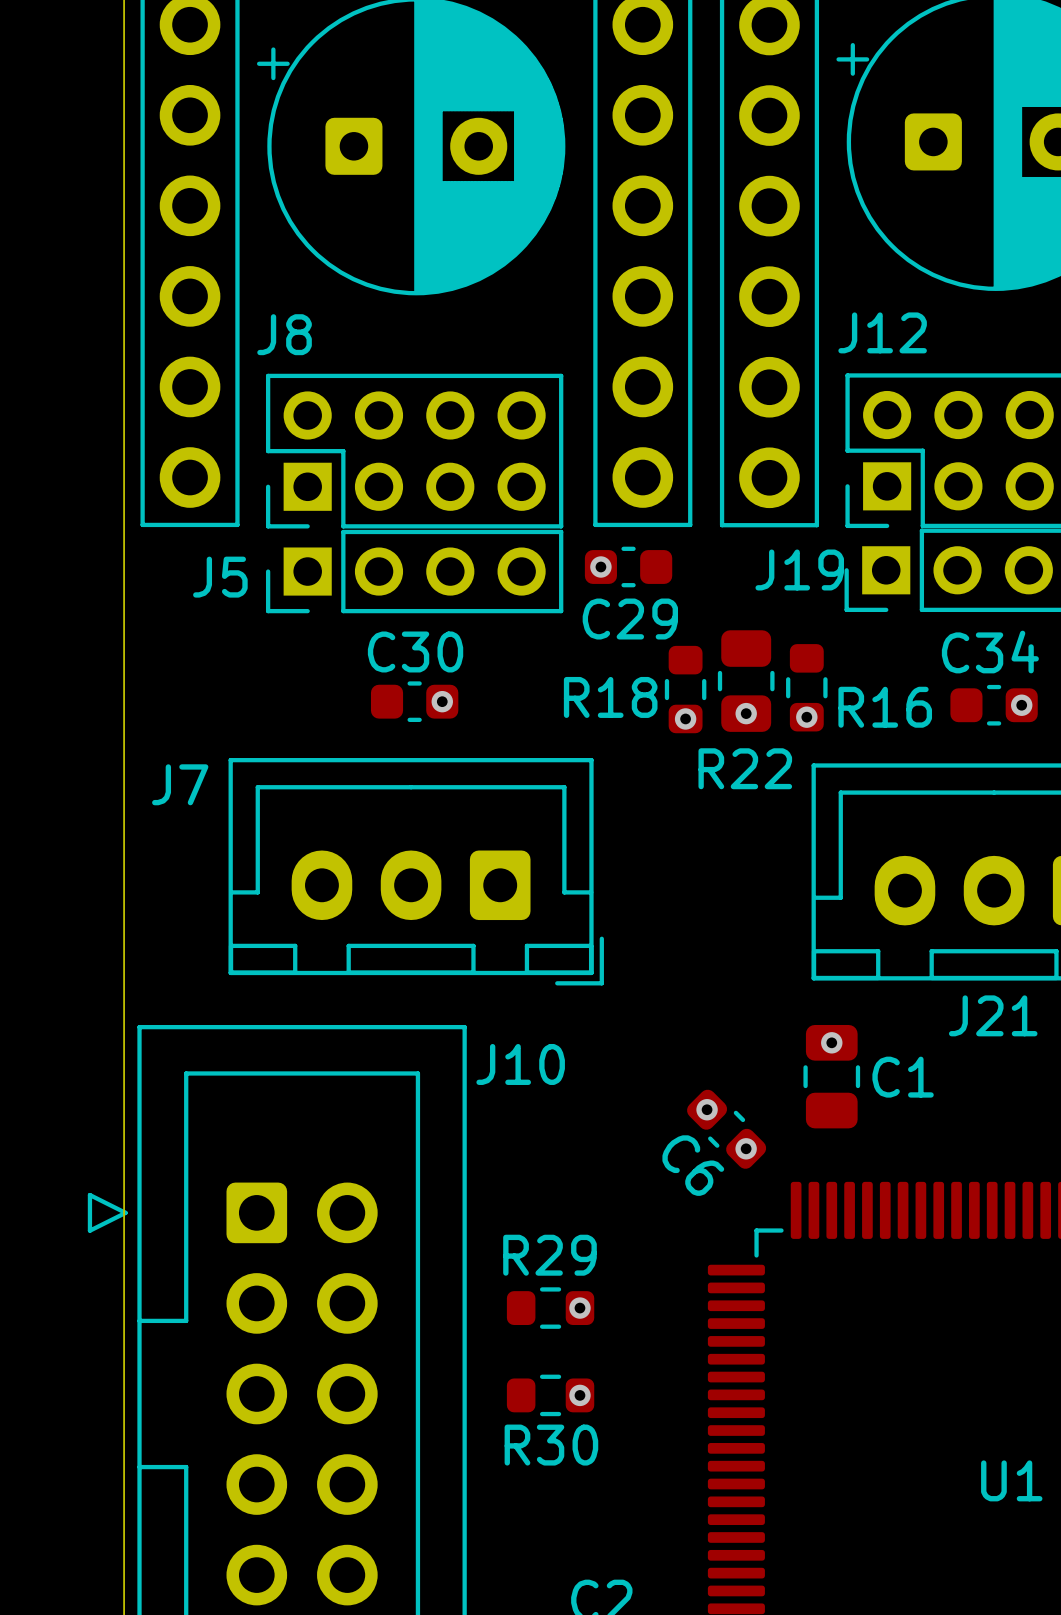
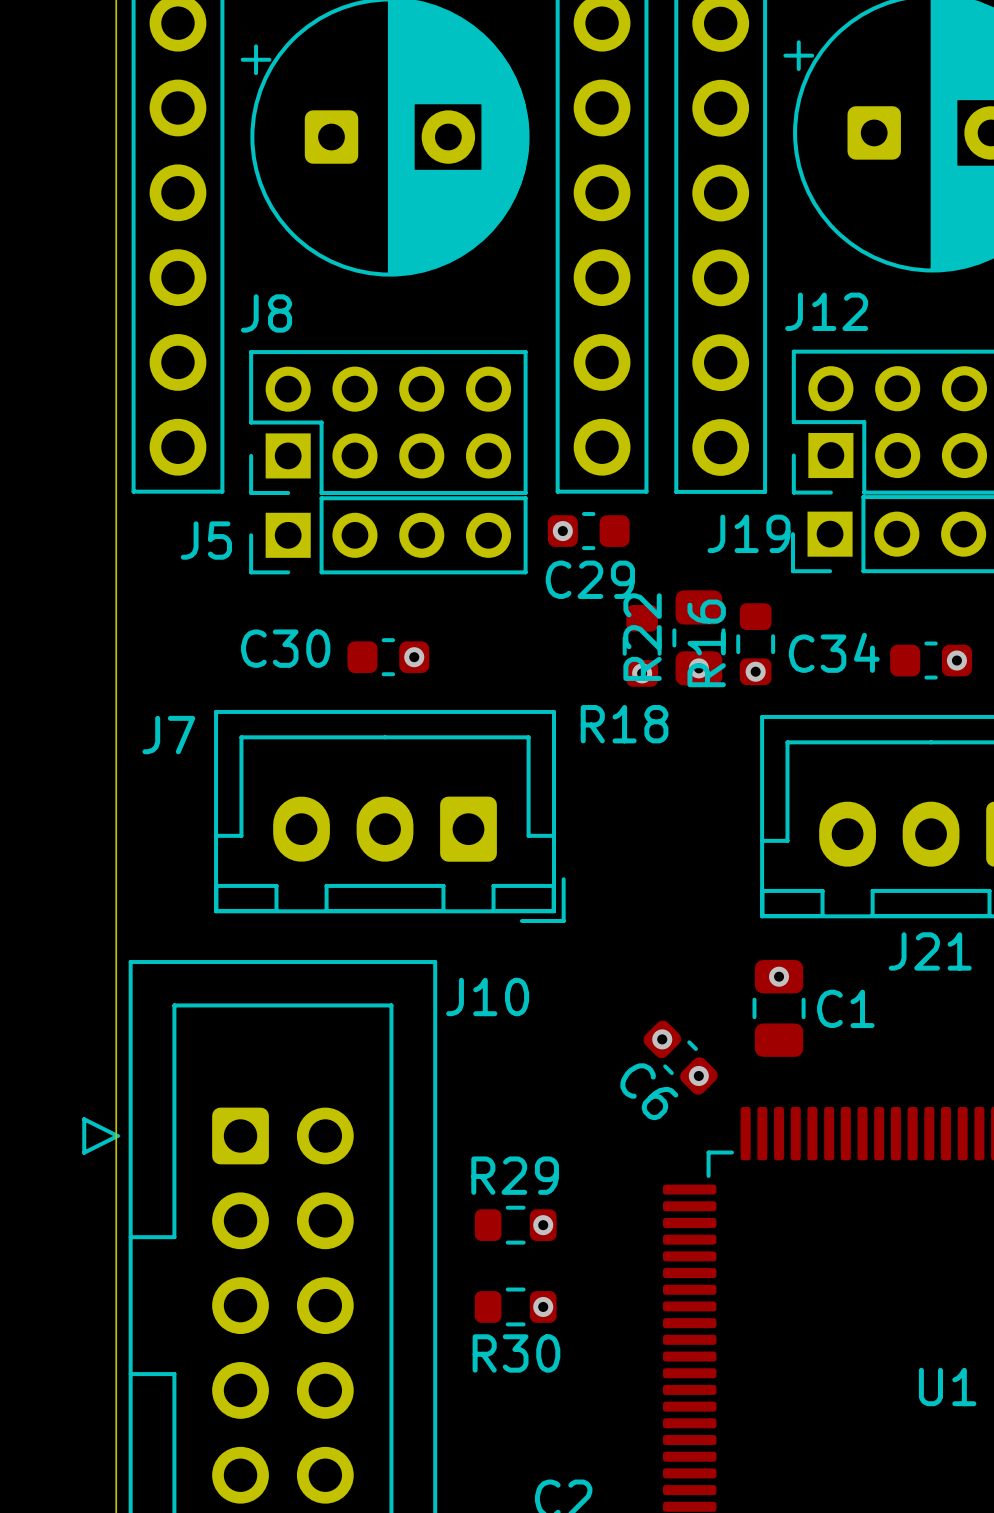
C30 name position: C30 (415, 651) -> C30 (285, 648)
C34 name position: C34 (990, 652) -> C34 (834, 652)
R18 name position: R18 (610, 697) -> R18 (624, 724)
R16 name rotation: 0° (885, 707) -> 90° counterclockwise (706, 643)
R16 name position: R16 (885, 707) -> R16 (706, 643)
R22 name rotation: 0° (745, 768) -> 90° counterclockwise (642, 637)

